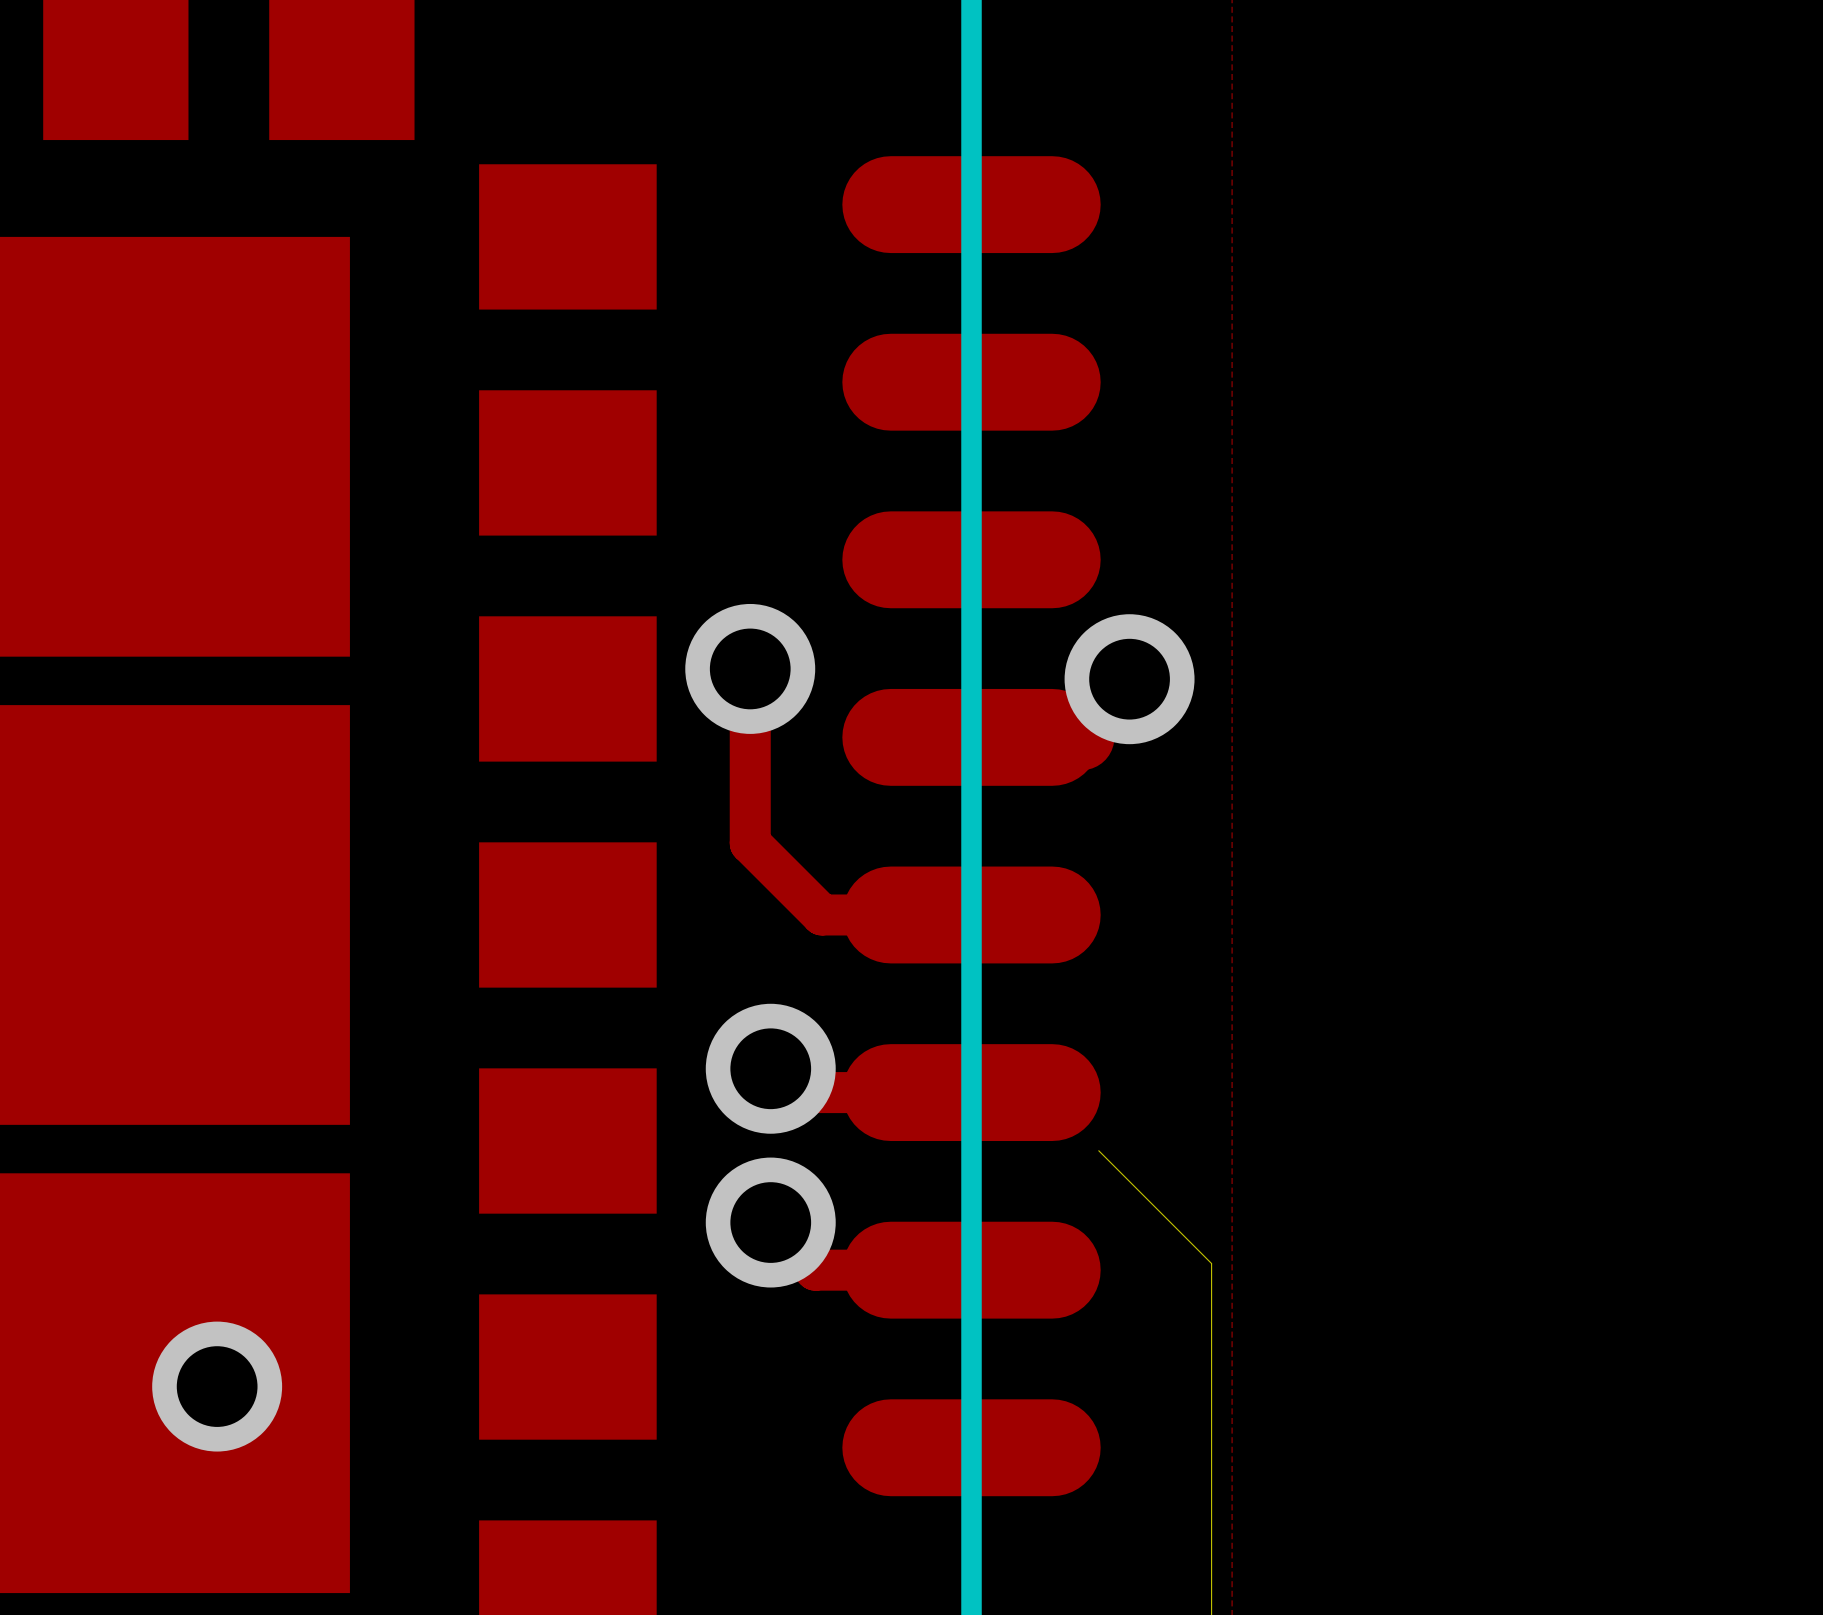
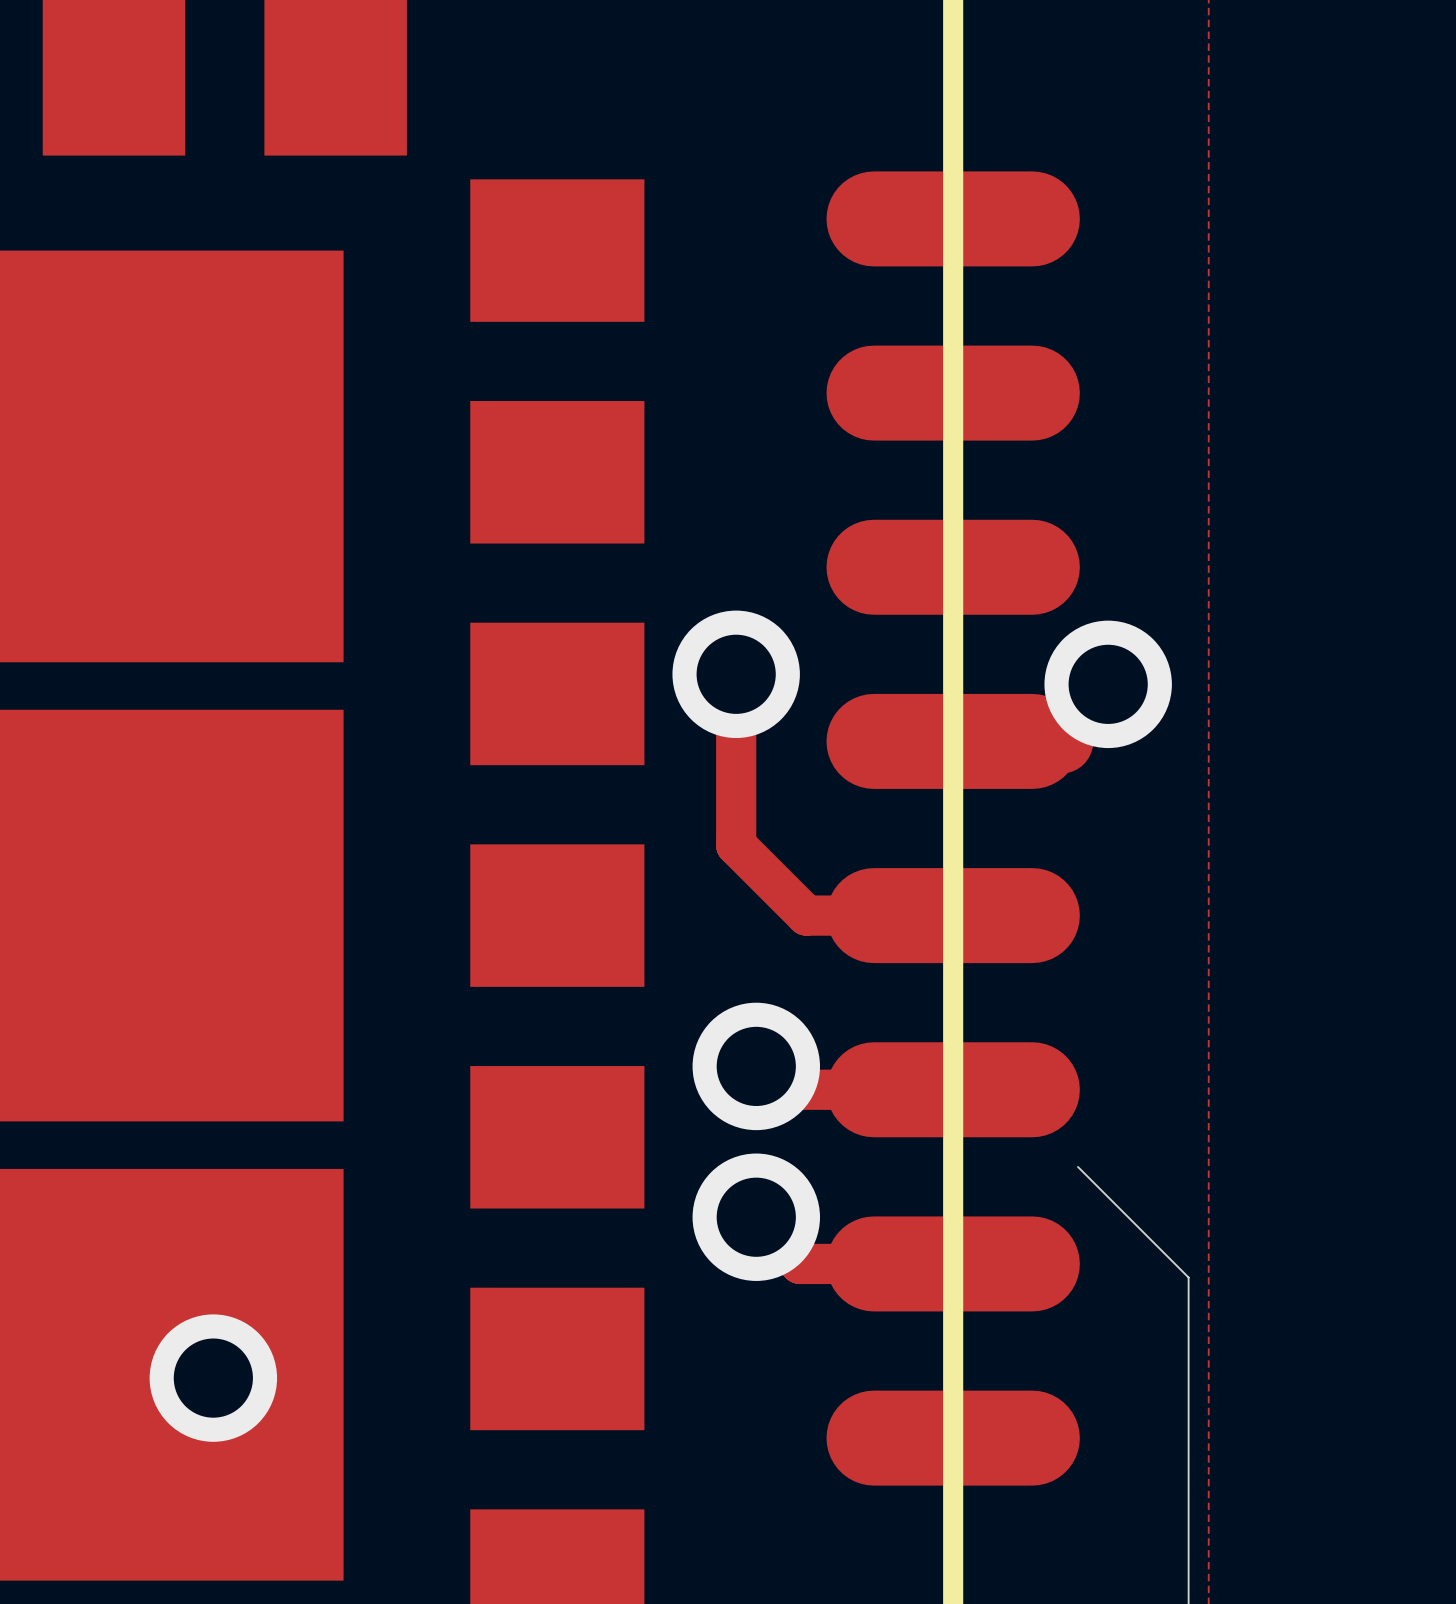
board edge: (1098, 1150) (1211, 1263) (1211, 1284) -> (1078, 1166) (1188, 1277)

